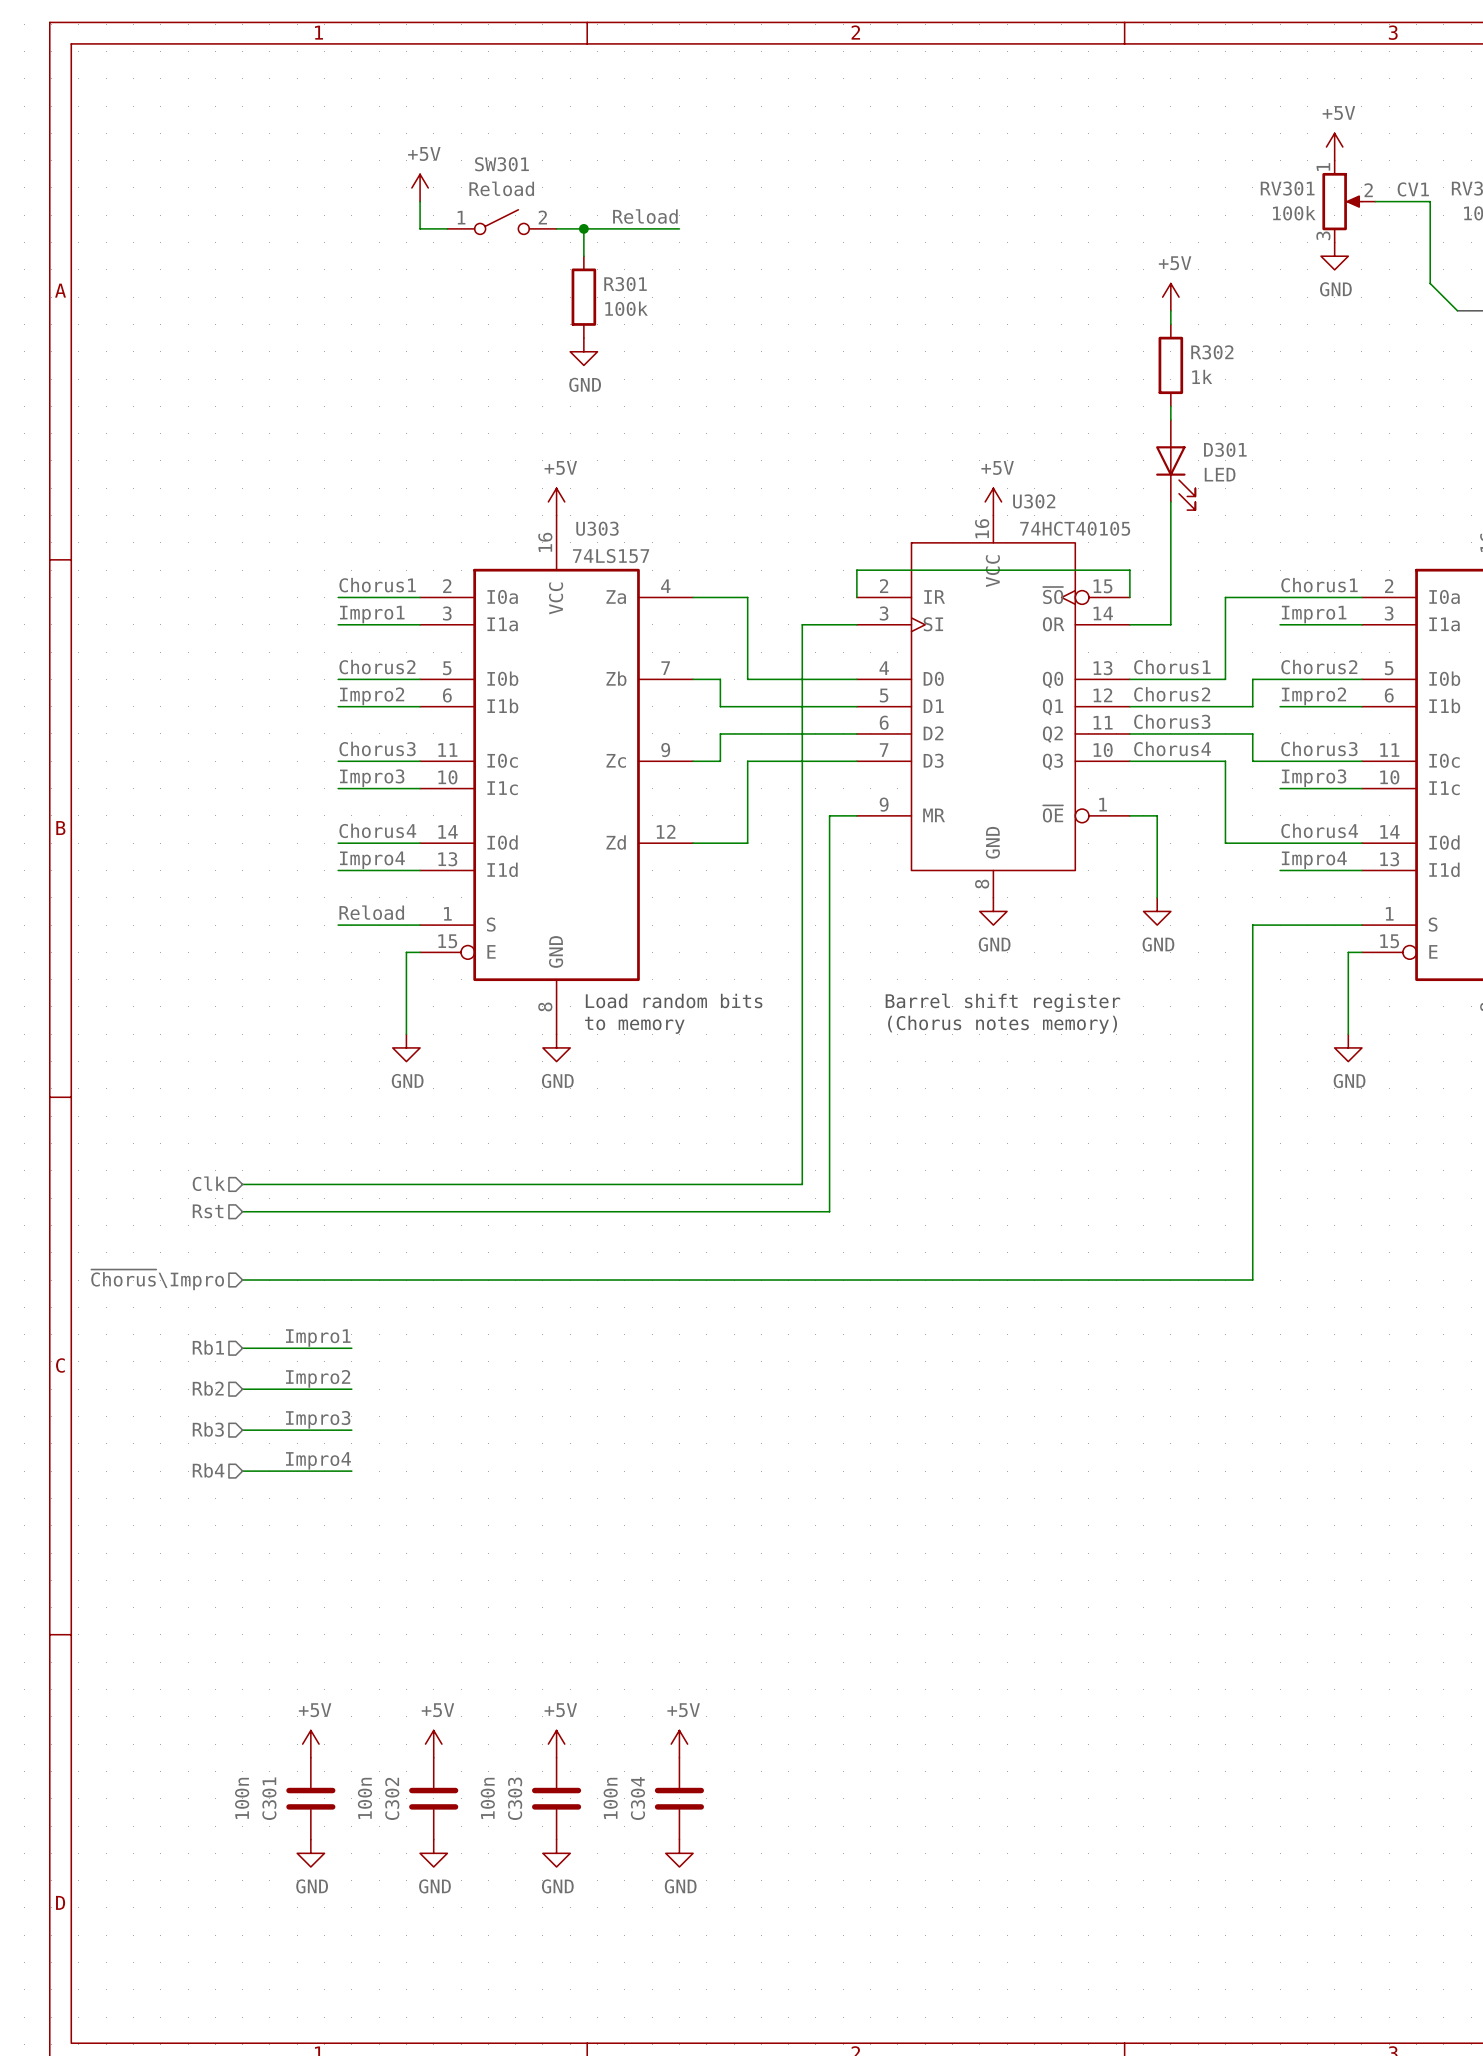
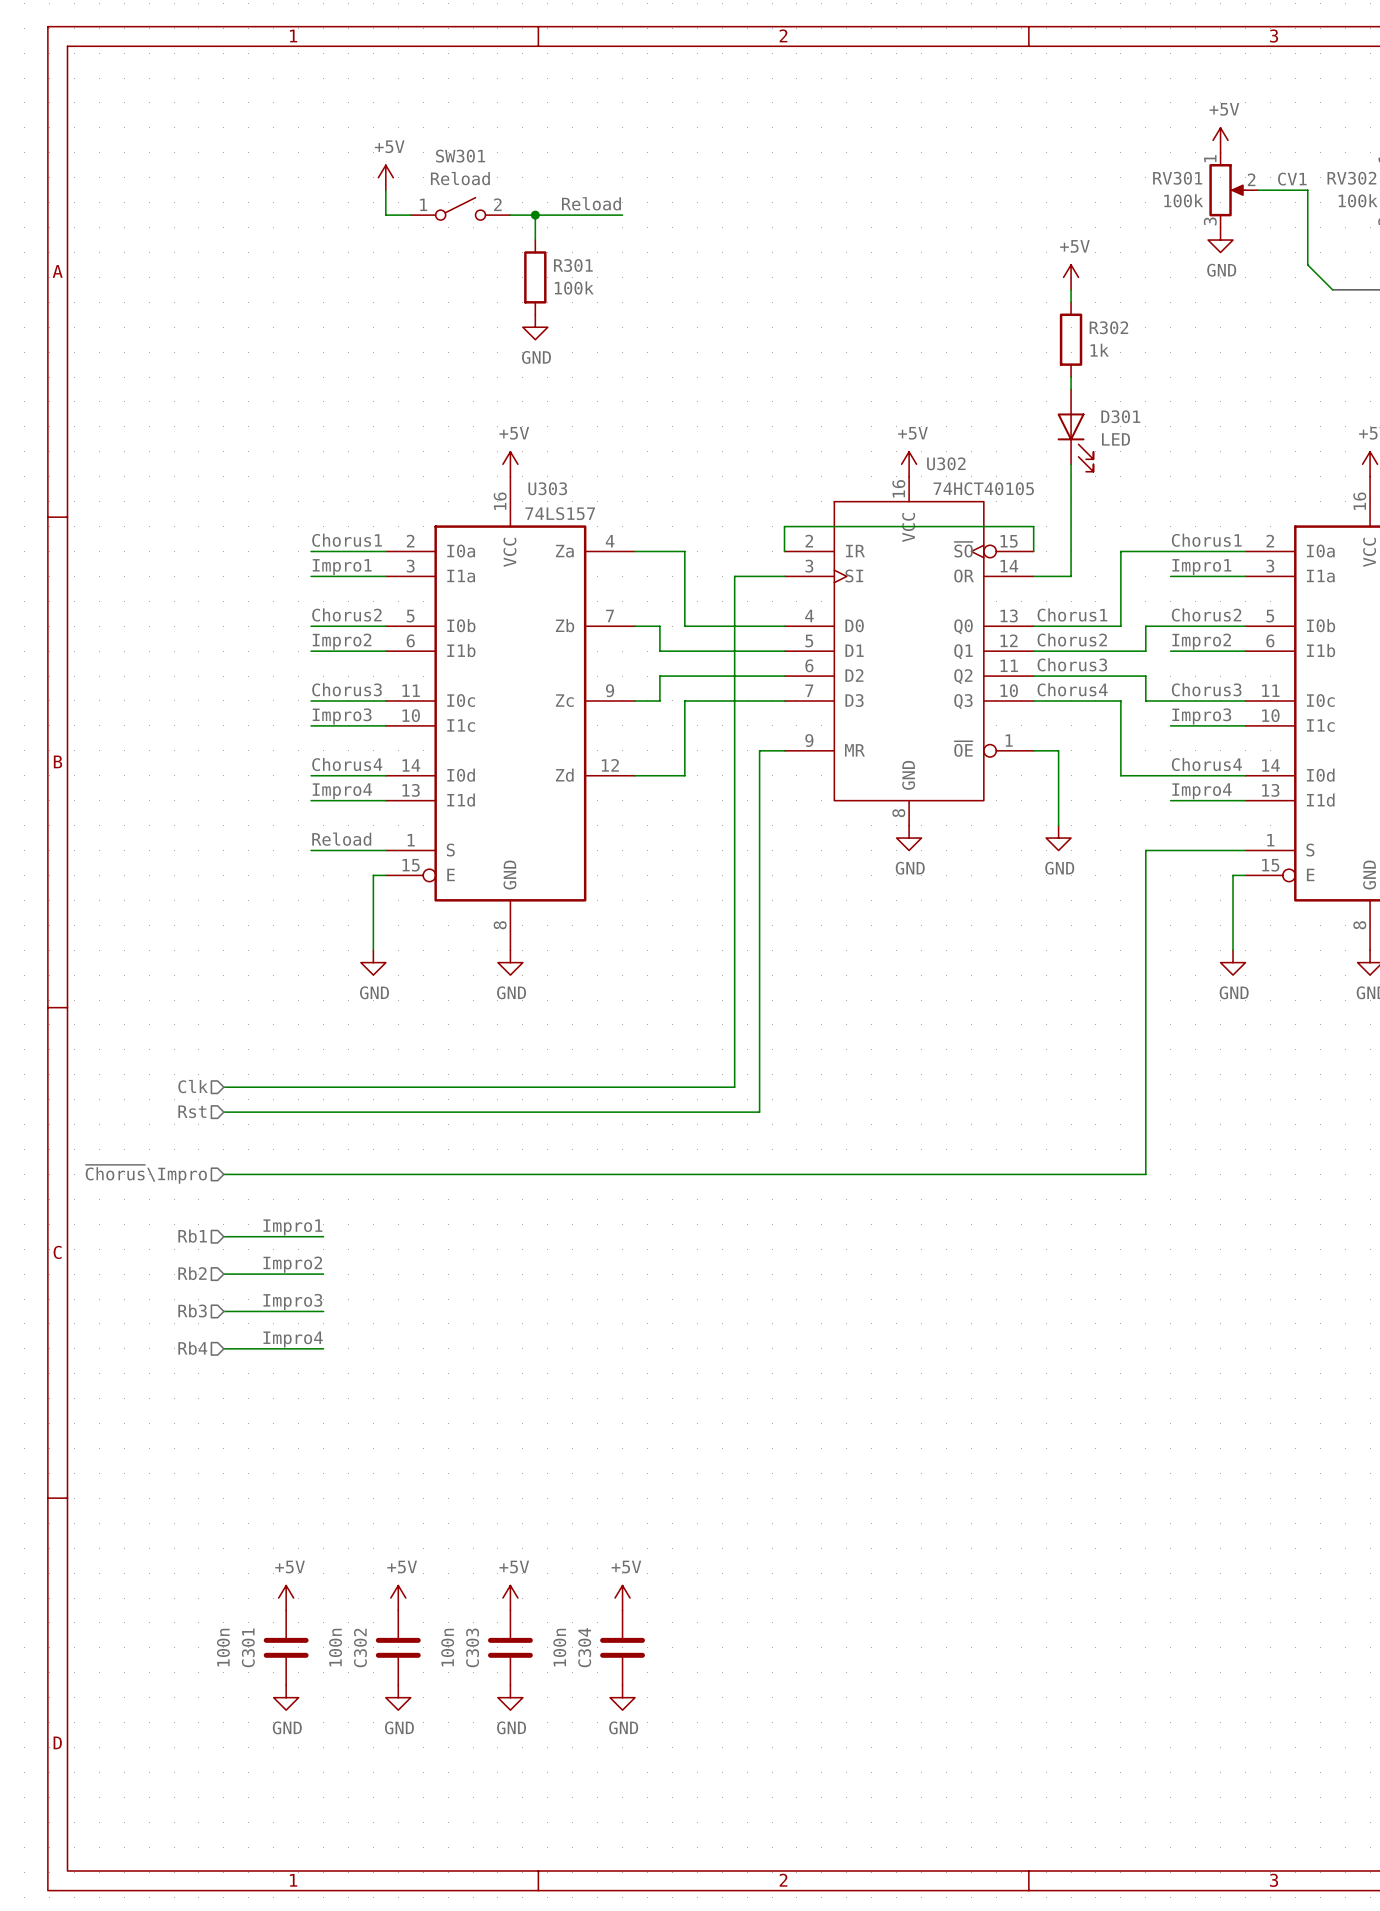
text: Load random bits (674, 1000) -> none
text: Barrel shift register (1002, 1002) -> none
text: (Chorus notes memory) (1002, 1024) -> none
text: to memory (634, 1025) -> none

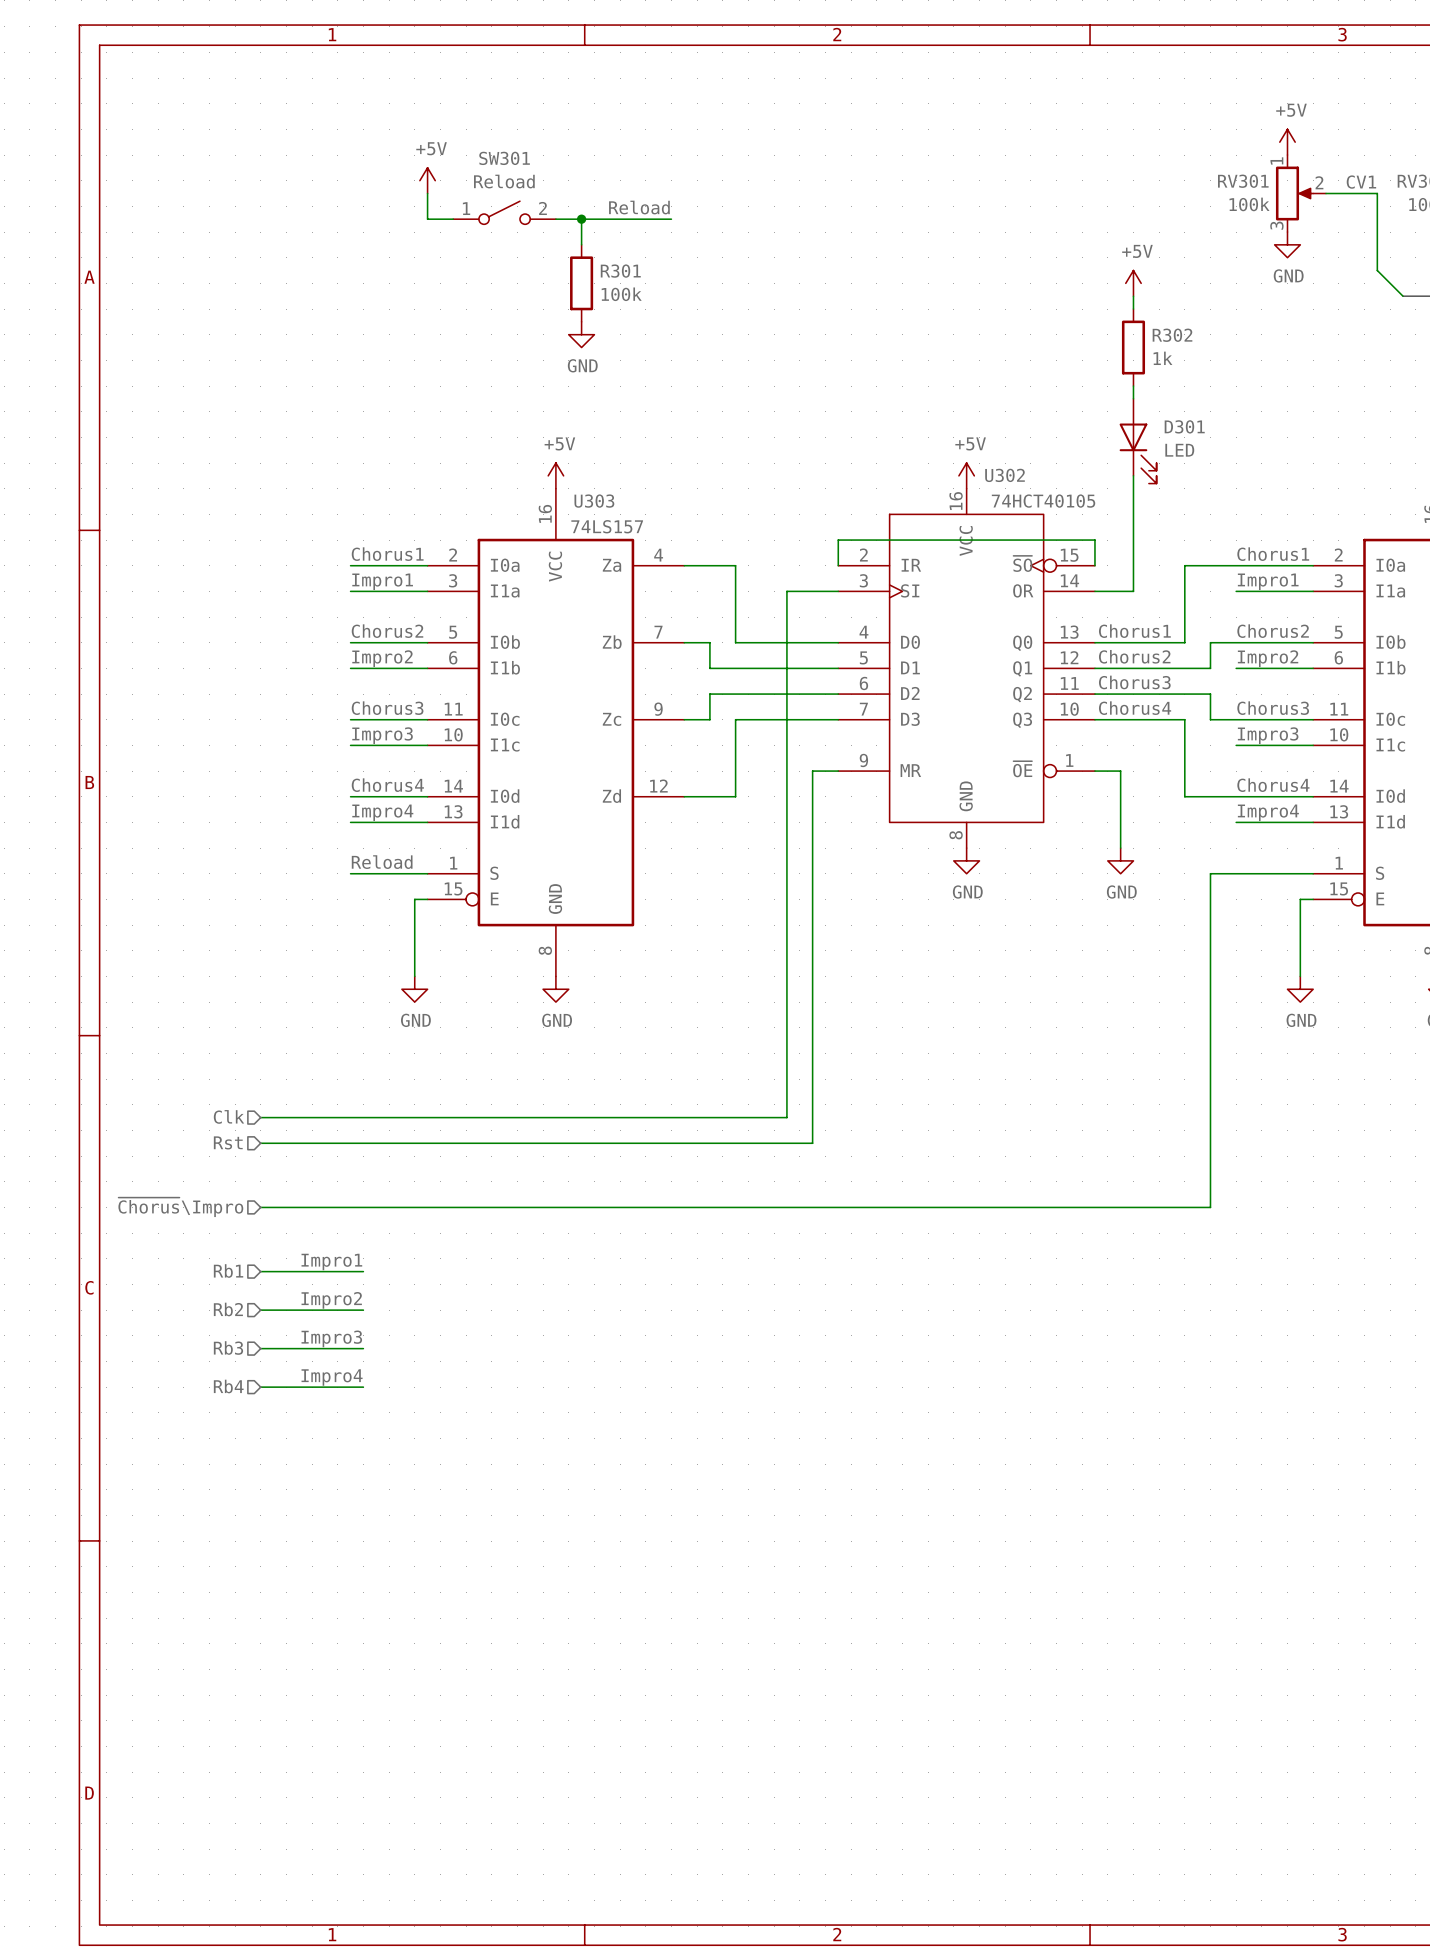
power symbol: +5V (286, 1598) -> none
power symbol: +5V (398, 1598) -> none
power symbol: +5V (510, 1598) -> none
power symbol: +5V (622, 1598) -> none
C301: 100n (286, 1647) -> none
C302: 100n (398, 1647) -> none
C303: 100n (510, 1647) -> none
C304: 100n (622, 1647) -> none
power symbol: GND (286, 1697) -> none
power symbol: GND (398, 1697) -> none
power symbol: GND (510, 1697) -> none
power symbol: GND (622, 1697) -> none

